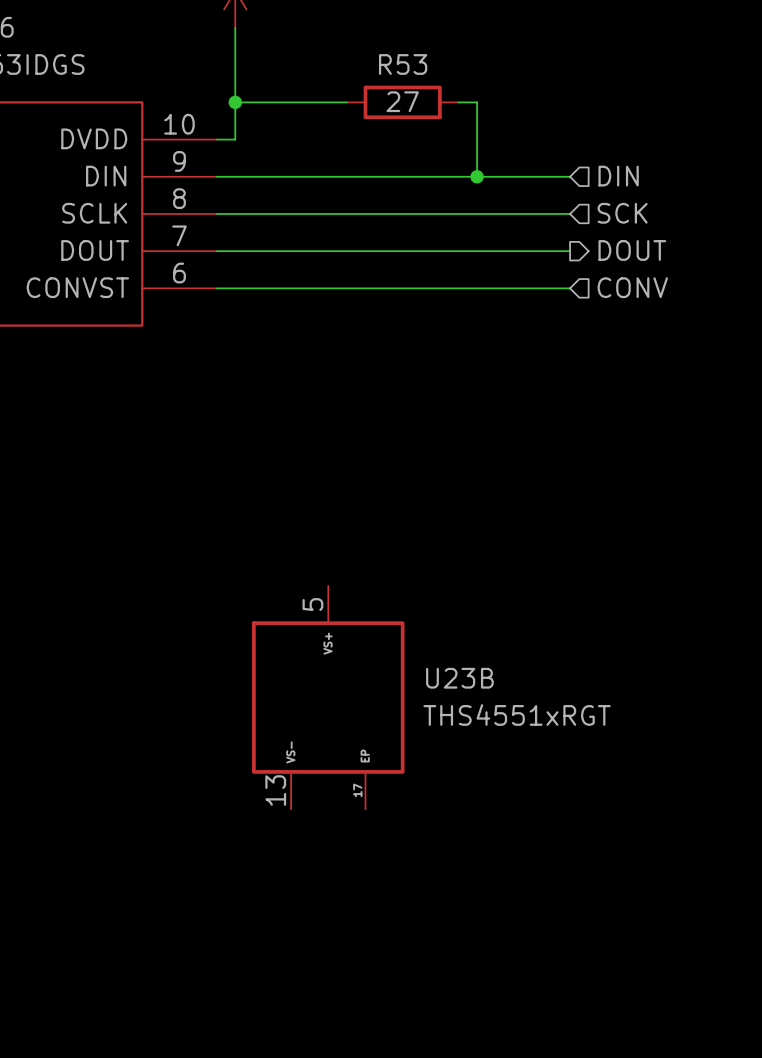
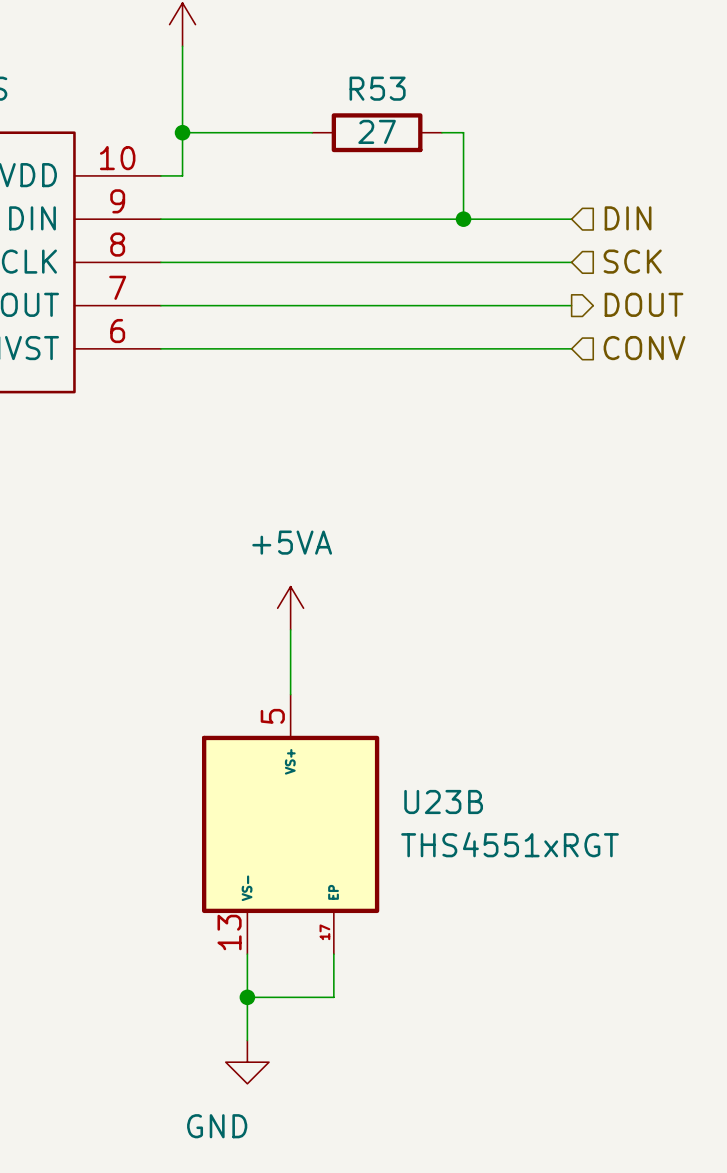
power symbol: none -> +5VA (290, 608)
wire: none -> (290, 629) (290, 694)
wire: none -> (247, 954) (247, 1040)
wire: none -> (333, 954) (333, 997) (247, 997)
junction: none -> (247, 997)
power symbol: none -> GND (247, 1062)

